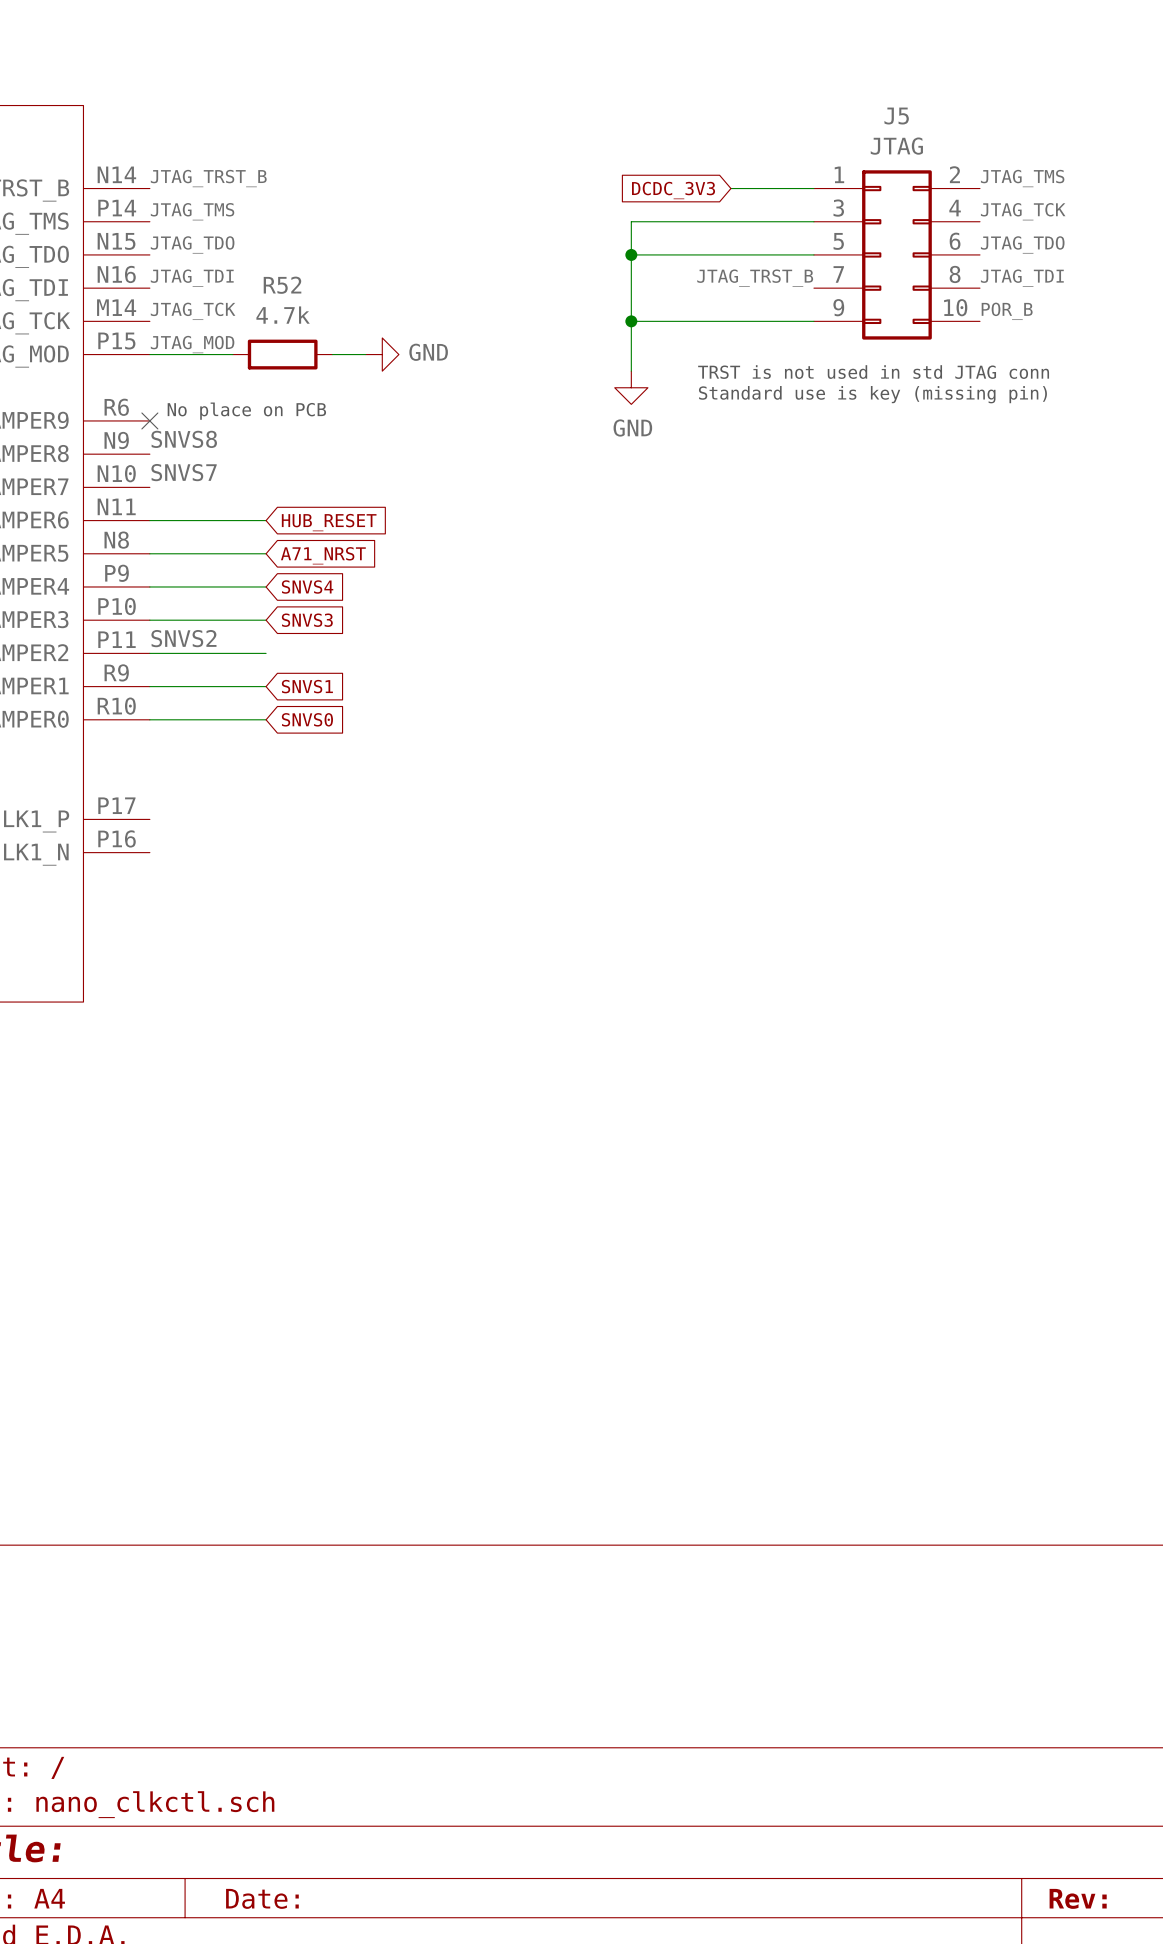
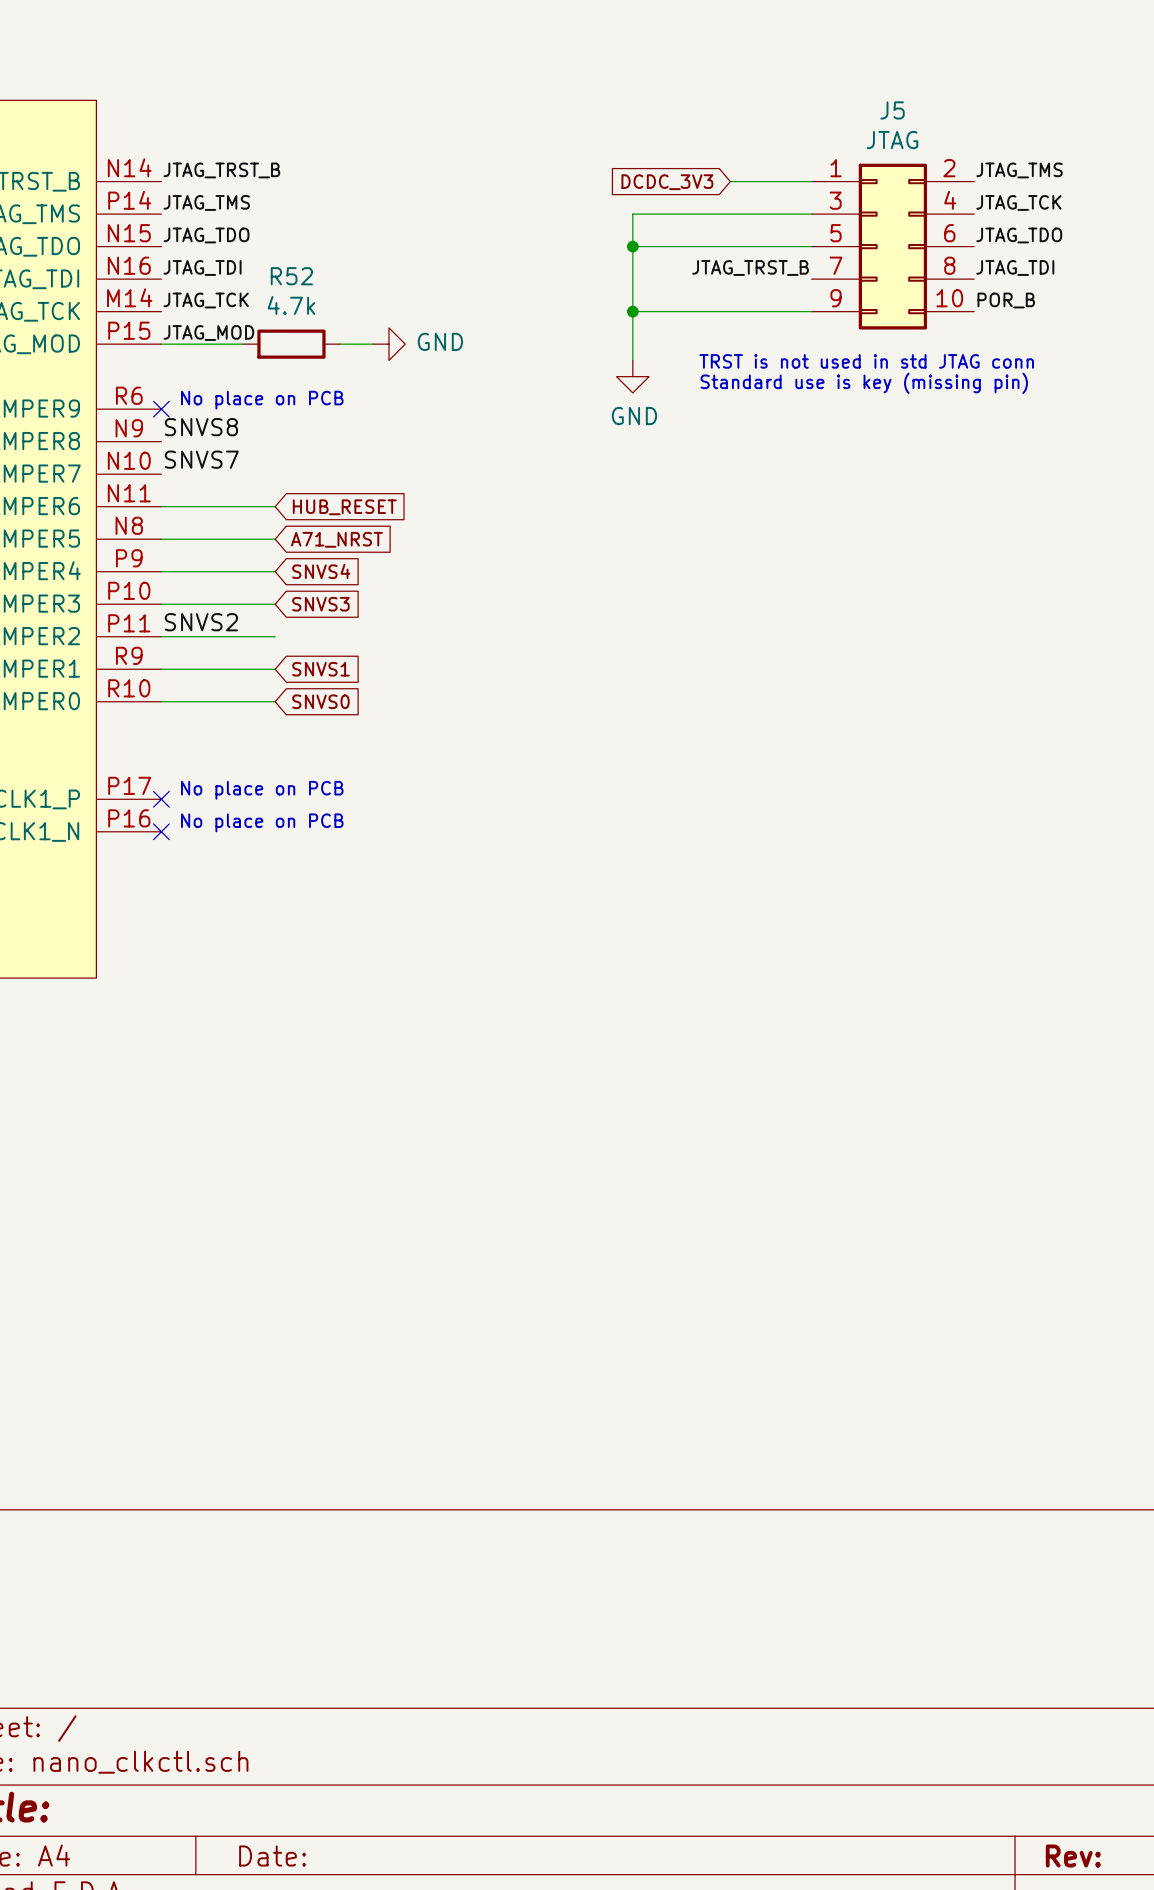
text: none -> No place on PCB (262, 790)
no-connect mark: none -> (161, 799)
text: none -> No place on PCB (262, 822)
no-connect mark: none -> (161, 831)

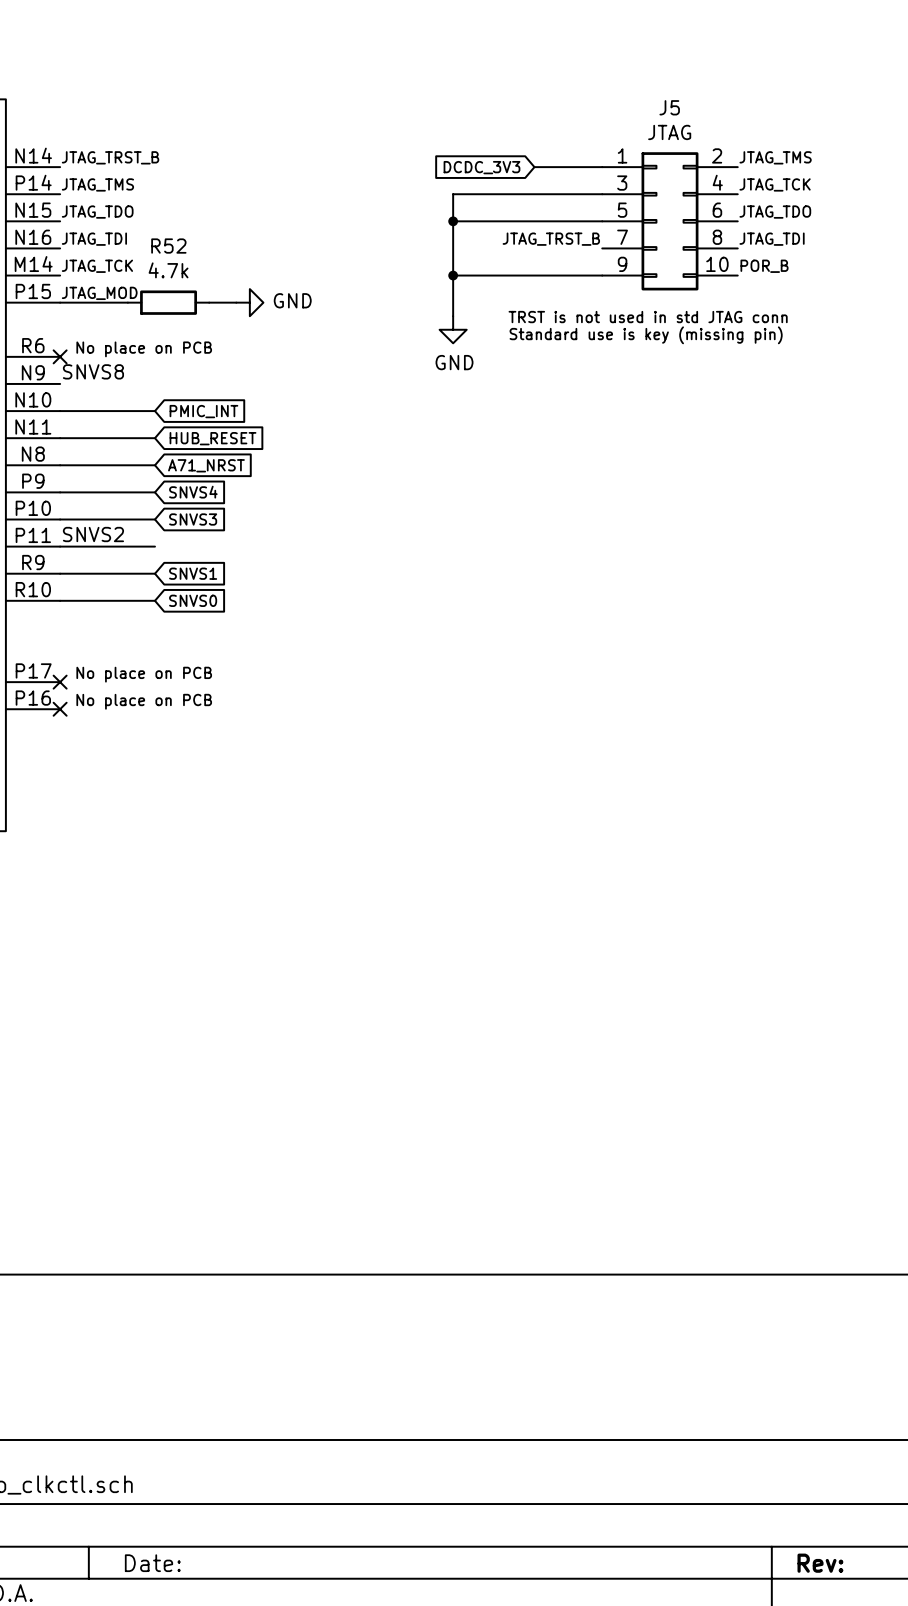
label: SNVS7 (201, 459) -> none
wire: none -> (60, 411) (154, 411)
global label: none -> PMIC_INT (203, 411)

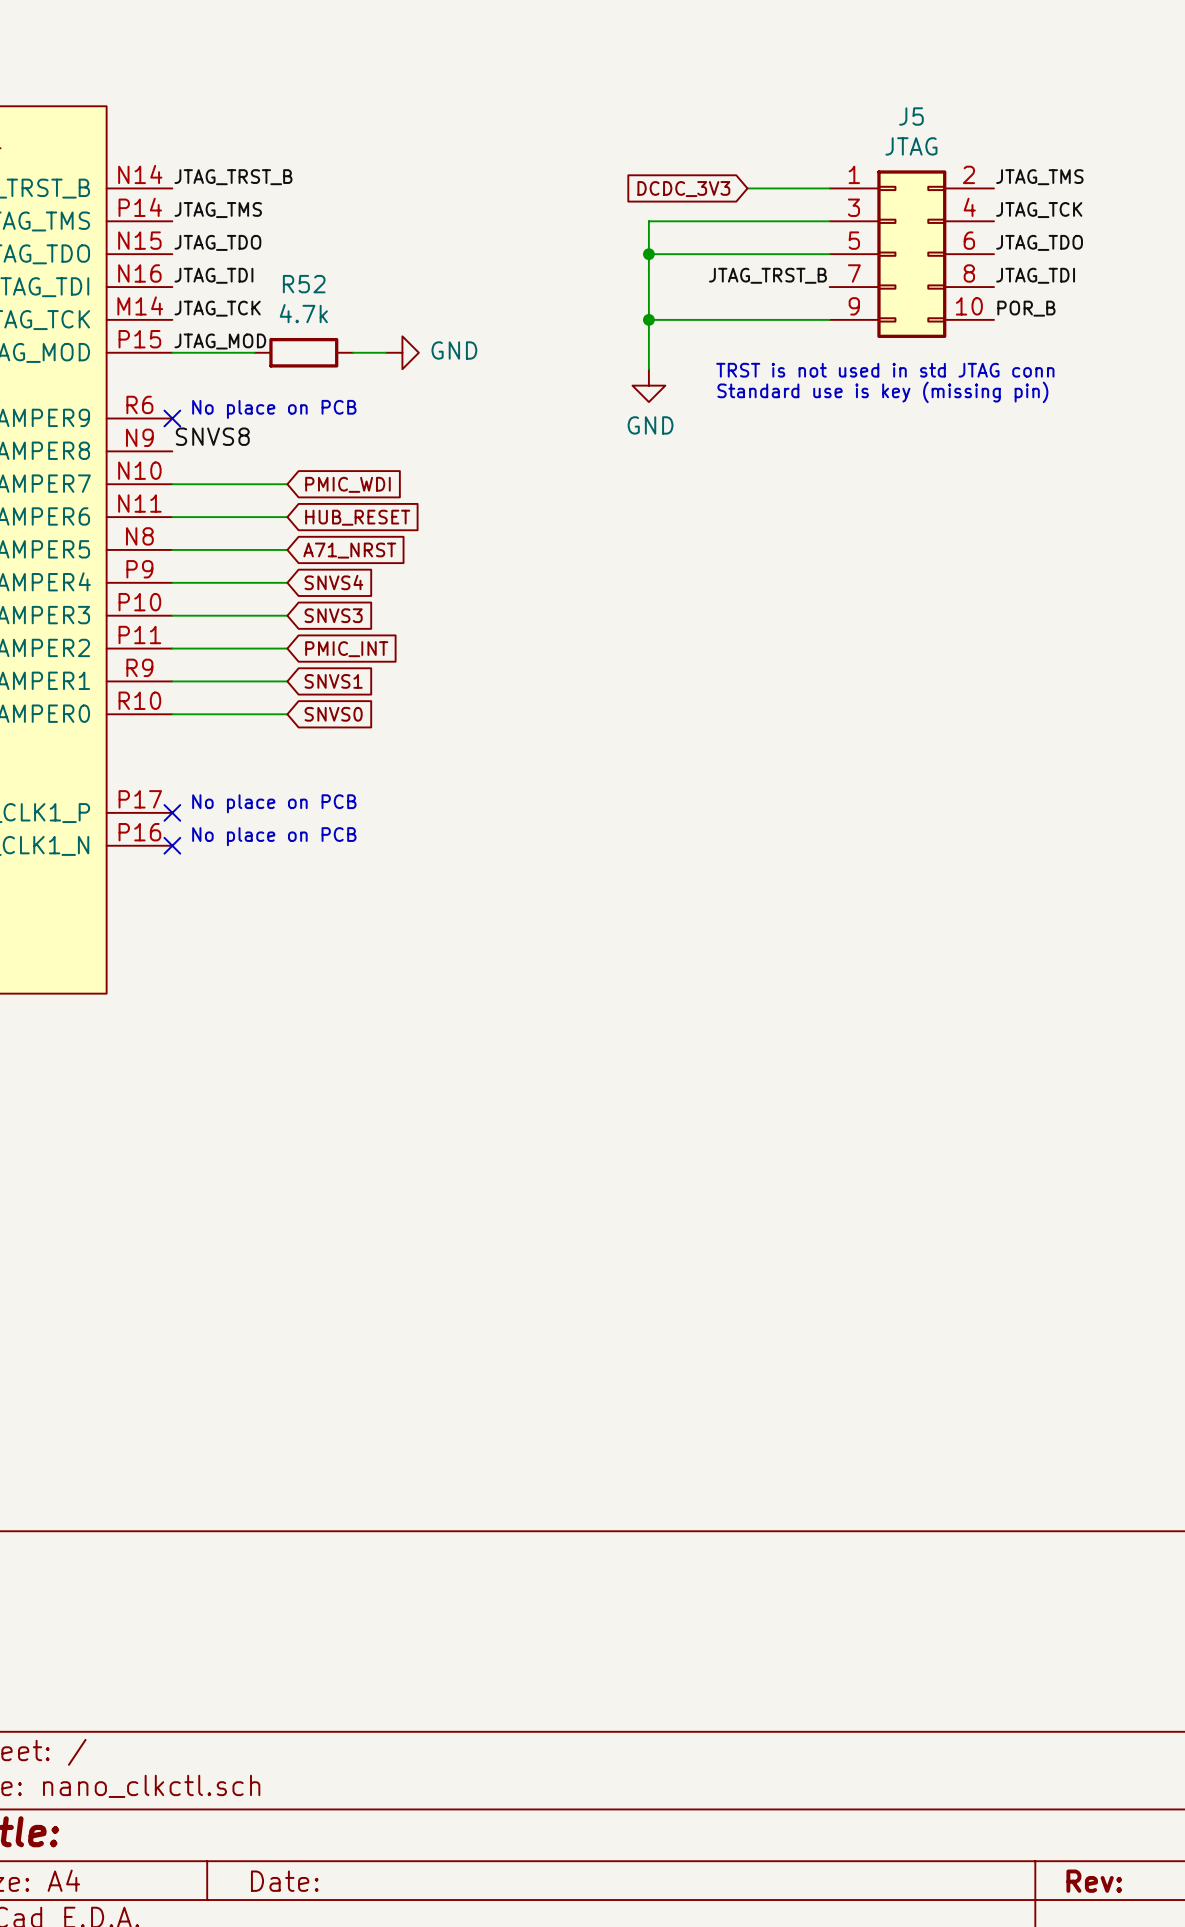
global label: PMIC_INT (203, 411) -> PMIC_WDI (347, 484)
label: SNVS2 (93, 534) -> none
global label: none -> PMIC_INT (346, 649)

